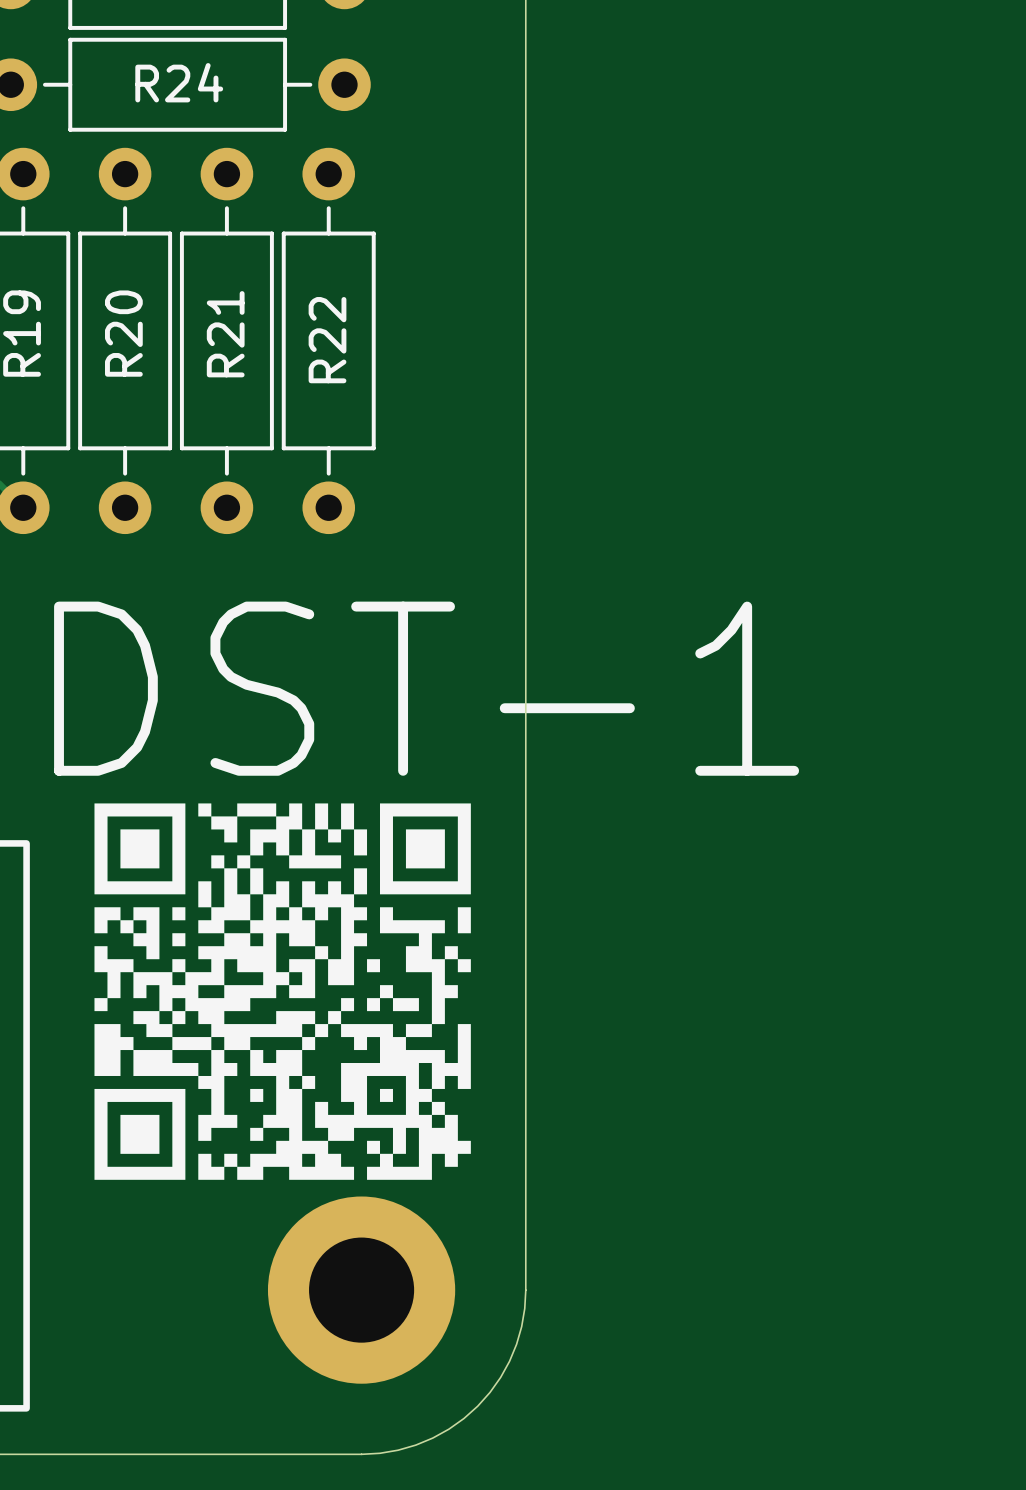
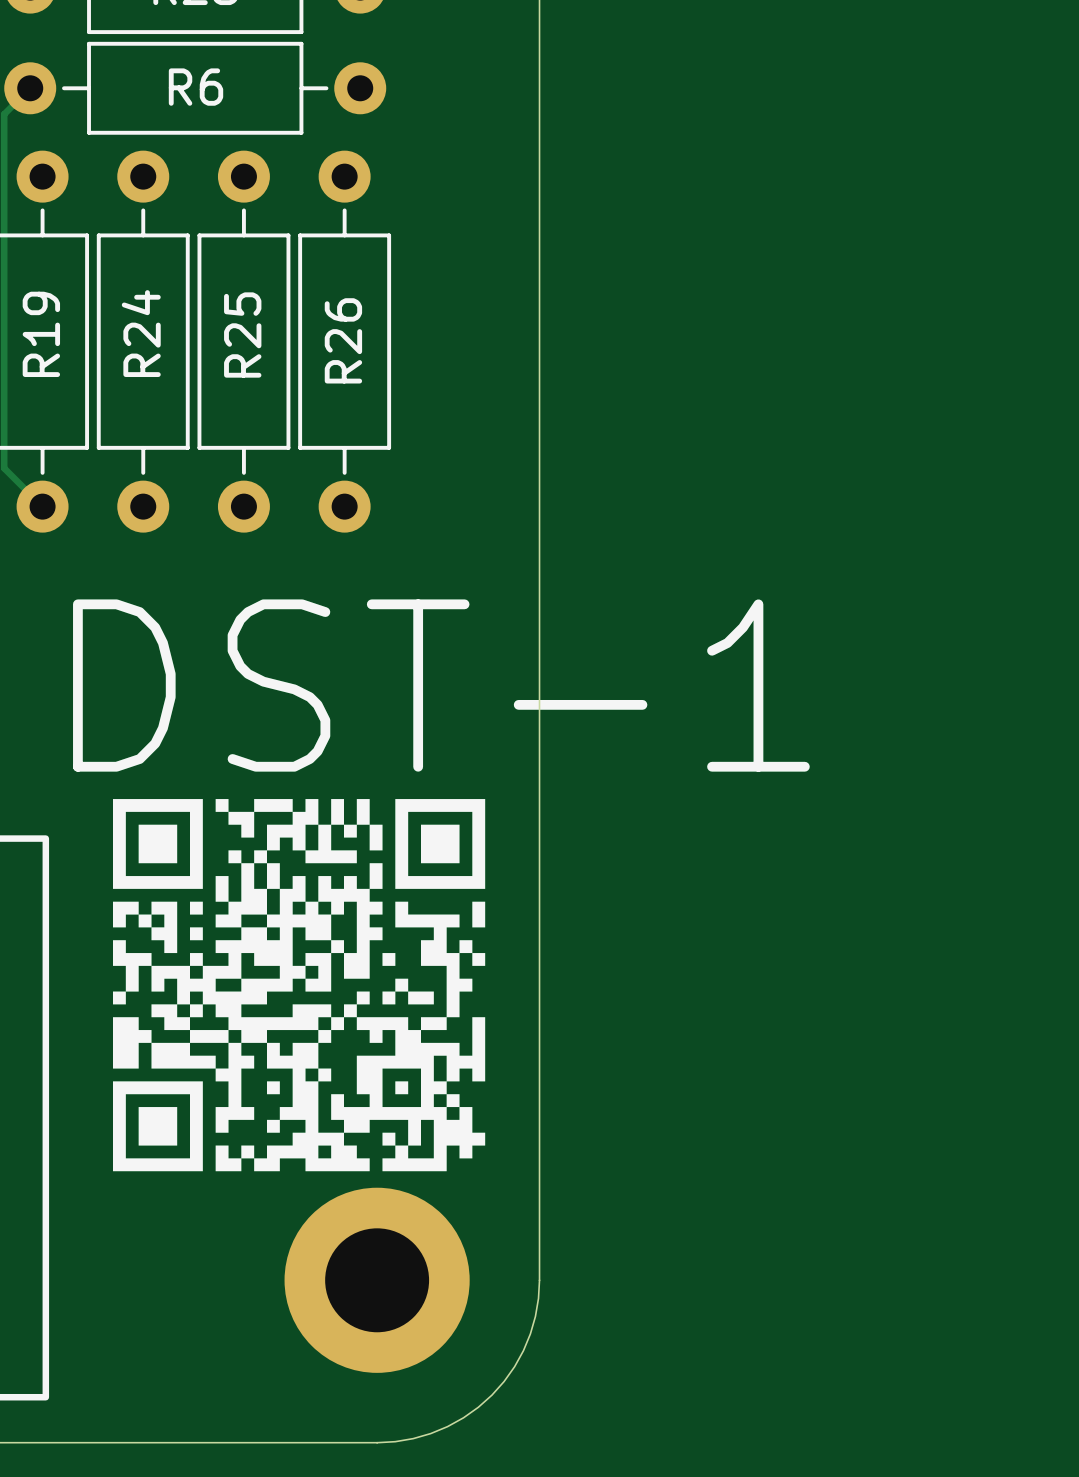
R24 name: R24 (179, 82) -> R6 (196, 87)
R20 name: R20 (123, 333) -> R24 (141, 333)
R21 name: R21 (225, 334) -> R25 (242, 335)
R22 name: R22 (327, 340) -> R26 (343, 340)

